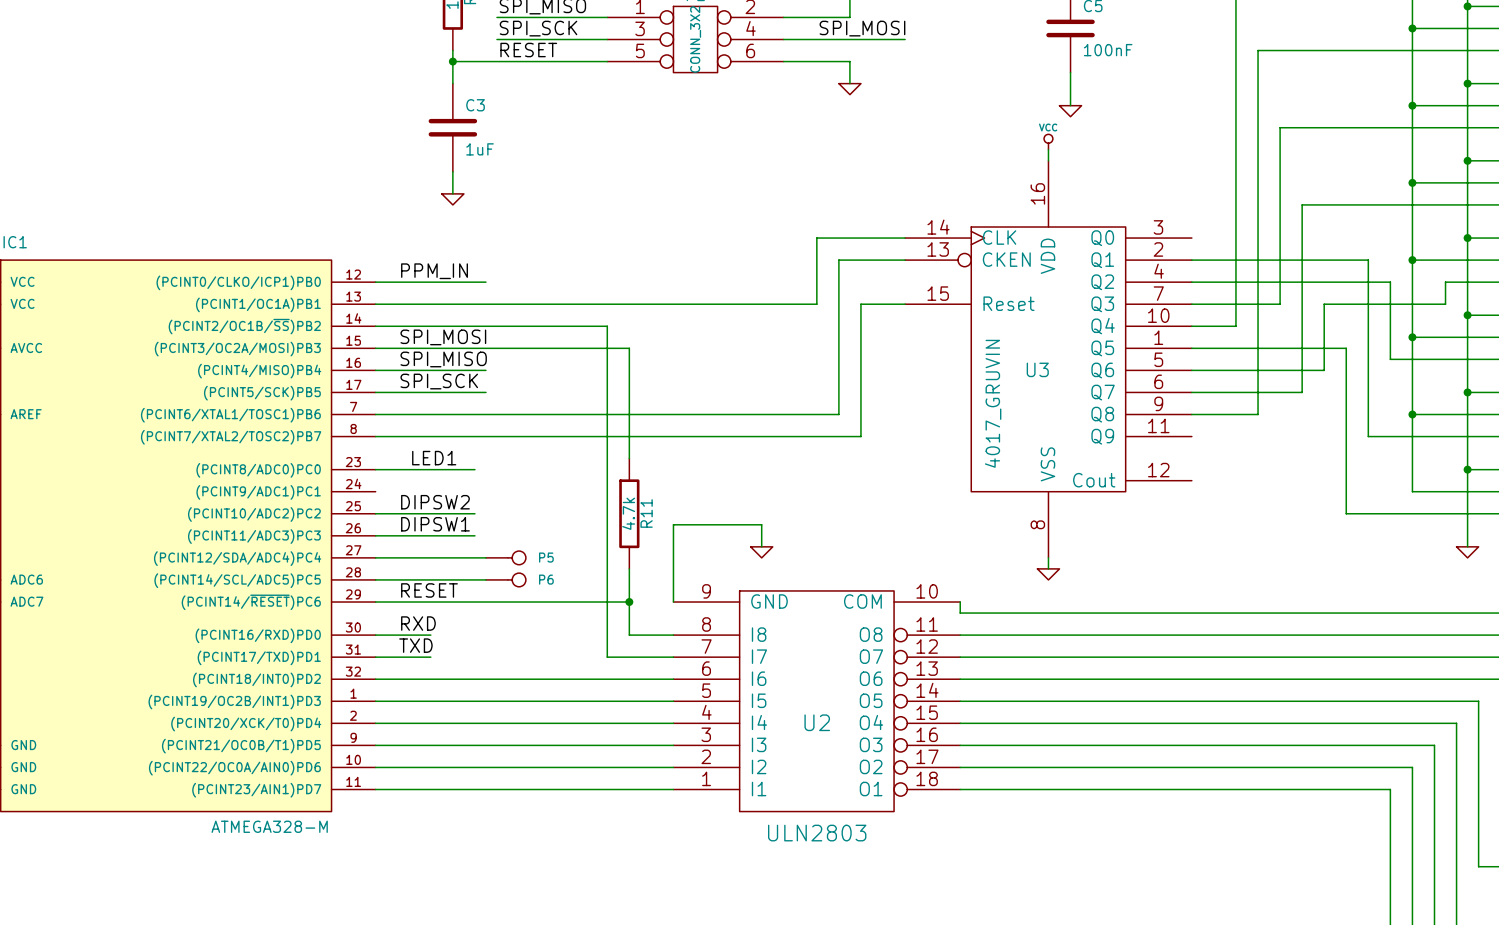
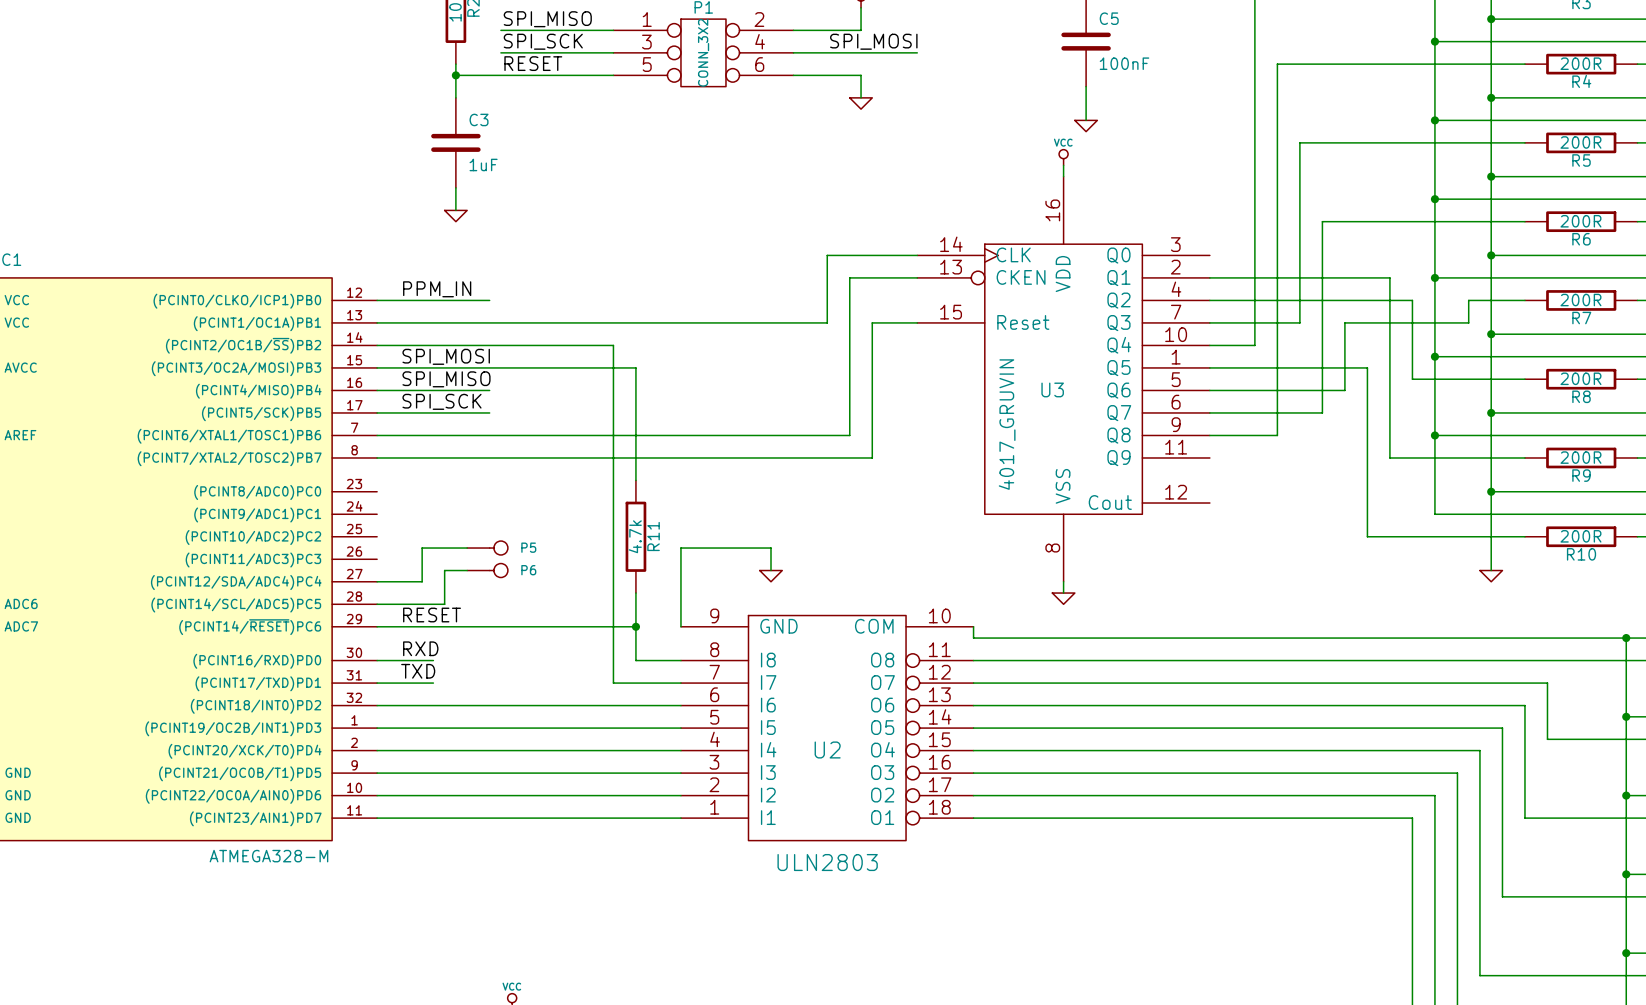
label: LED1 (434, 458) -> none
wire: (375, 469) (474, 469) -> none
label: DIPSW2 (435, 502) -> none
wire: (375, 513) (474, 513) -> none
label: DIPSW1 (435, 524) -> none
wire: (375, 535) (474, 535) -> none
wire: (419, 557) (485, 557) -> (422, 581) (422, 548) (467, 548)
P5 position: (505, 557) -> (487, 548)
wire: (441, 579) (485, 579) -> (444, 604) (444, 570) (467, 570)
P6 position: (505, 579) -> (487, 570)

